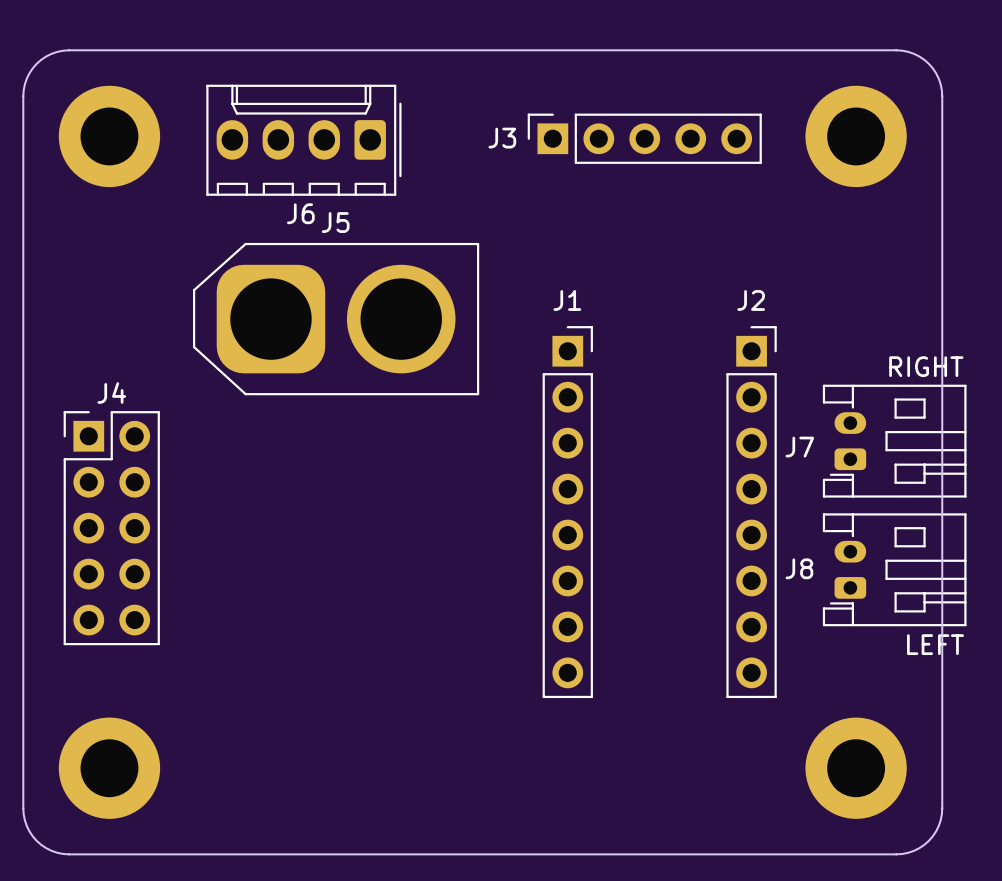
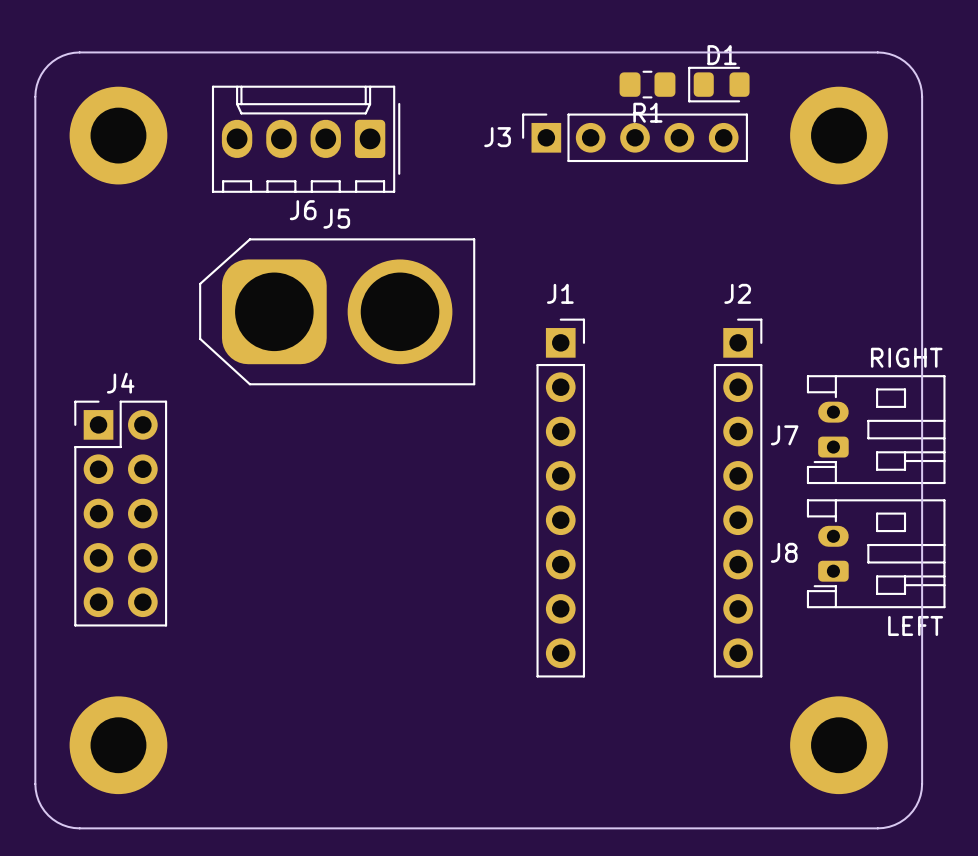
R1: none -> (647, 84)
D1: none -> (718, 84)

